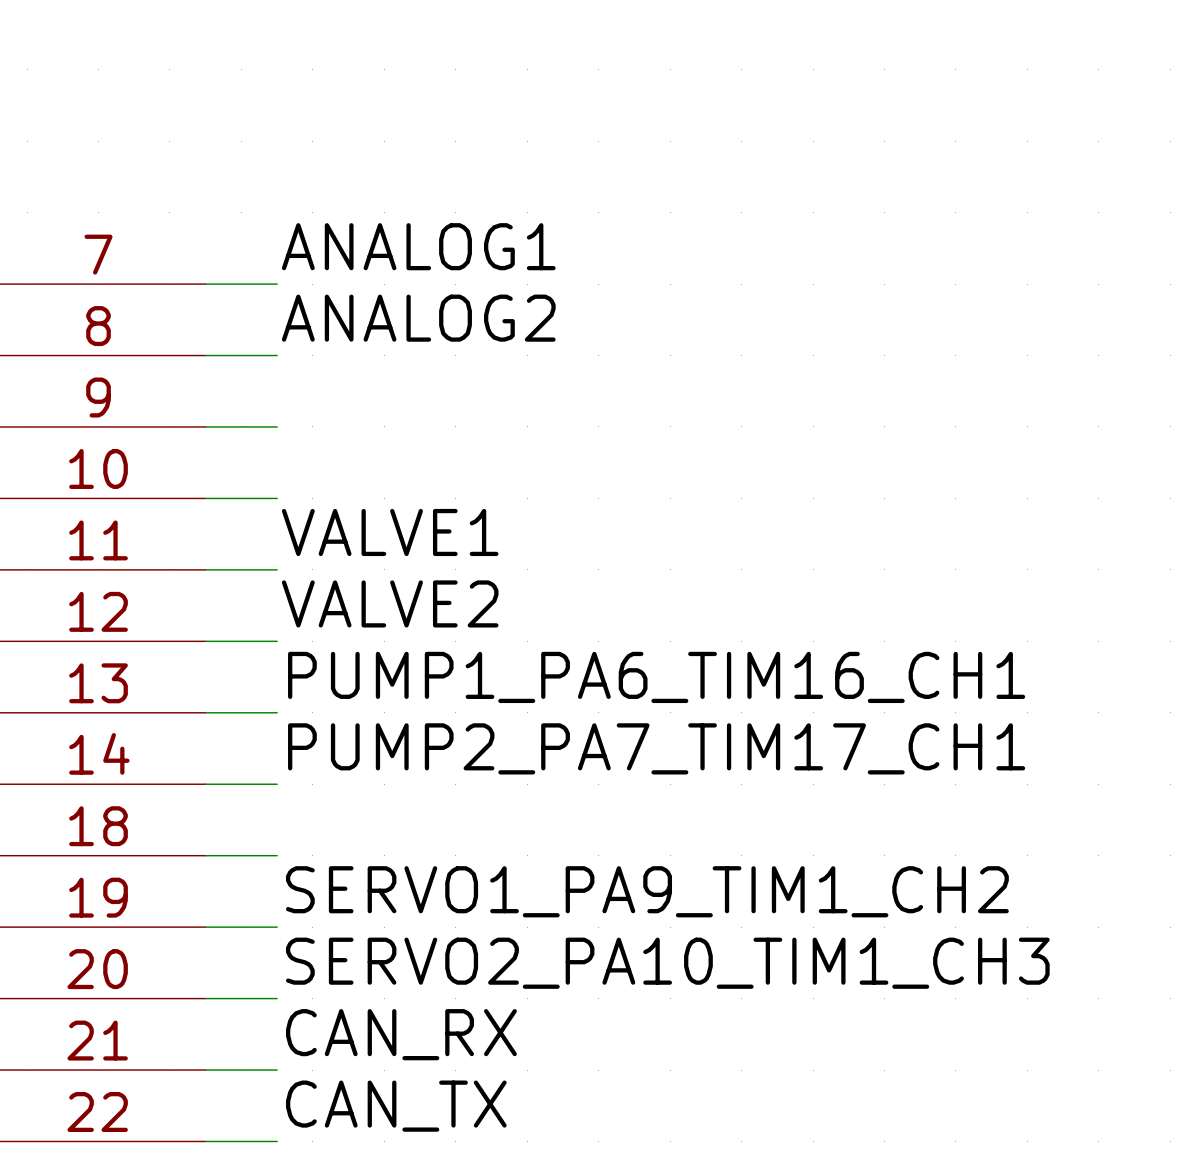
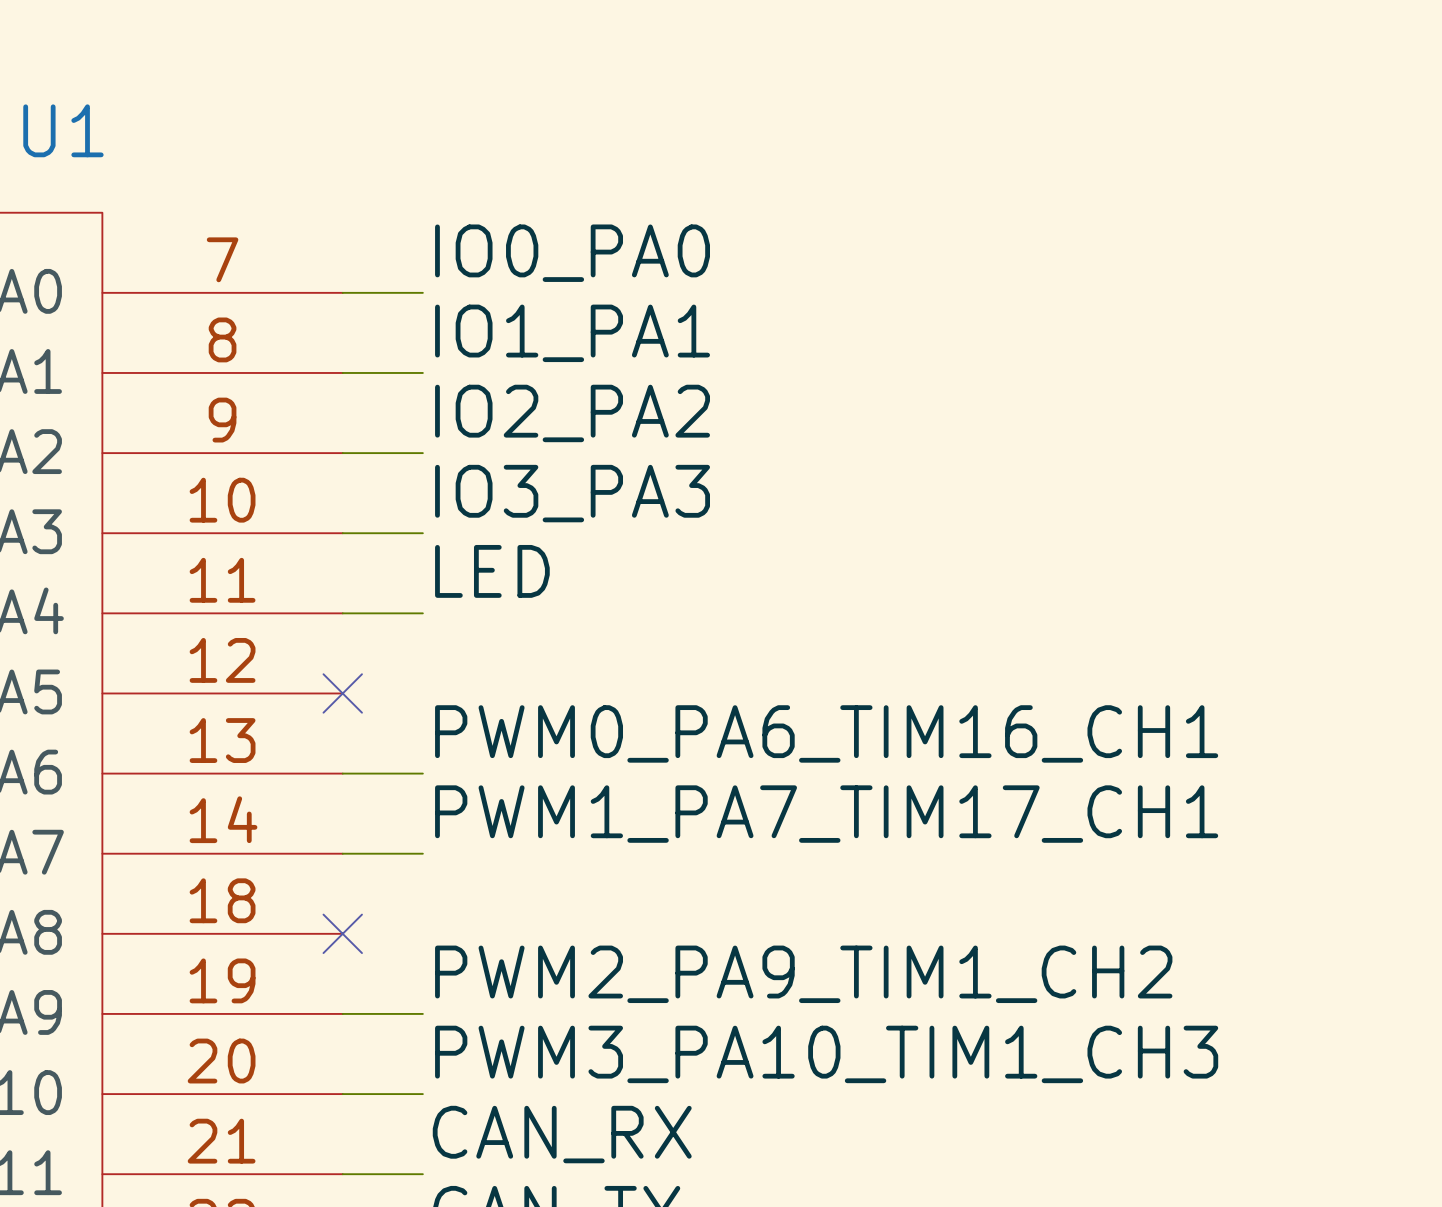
label: ANALOG1 (418, 246) -> IO0_PA0 (572, 253)
label: ANALOG2 (418, 318) -> IO1_PA1 (572, 333)
label: none -> IO2_PA2 (572, 413)
label: none -> IO3_PA3 (572, 493)
label: VALVE1 (390, 532) -> LED (492, 571)
label: VALVE2 (390, 603) -> none
wire: (205, 641) (277, 641) -> none
no-connect mark: none -> (342, 693)
label: PUMP1_PA6_TIM16_CH1 (656, 677) -> PWM0_PA6_TIM16_CH1 (826, 733)
label: PUMP2_PA7_TIM17_CH1 (656, 748) -> PWM1_PA7_TIM17_CH1 (826, 814)
wire: (205, 855) (277, 855) -> none
no-connect mark: none -> (342, 933)
label: SERVO1_PA9_TIM1_CH2 (647, 891) -> PWM2_PA9_TIM1_CH2 (803, 974)
label: SERVO2_PA10_TIM1_CH3 (667, 963) -> PWM3_PA10_TIM1_CH3 (826, 1054)

